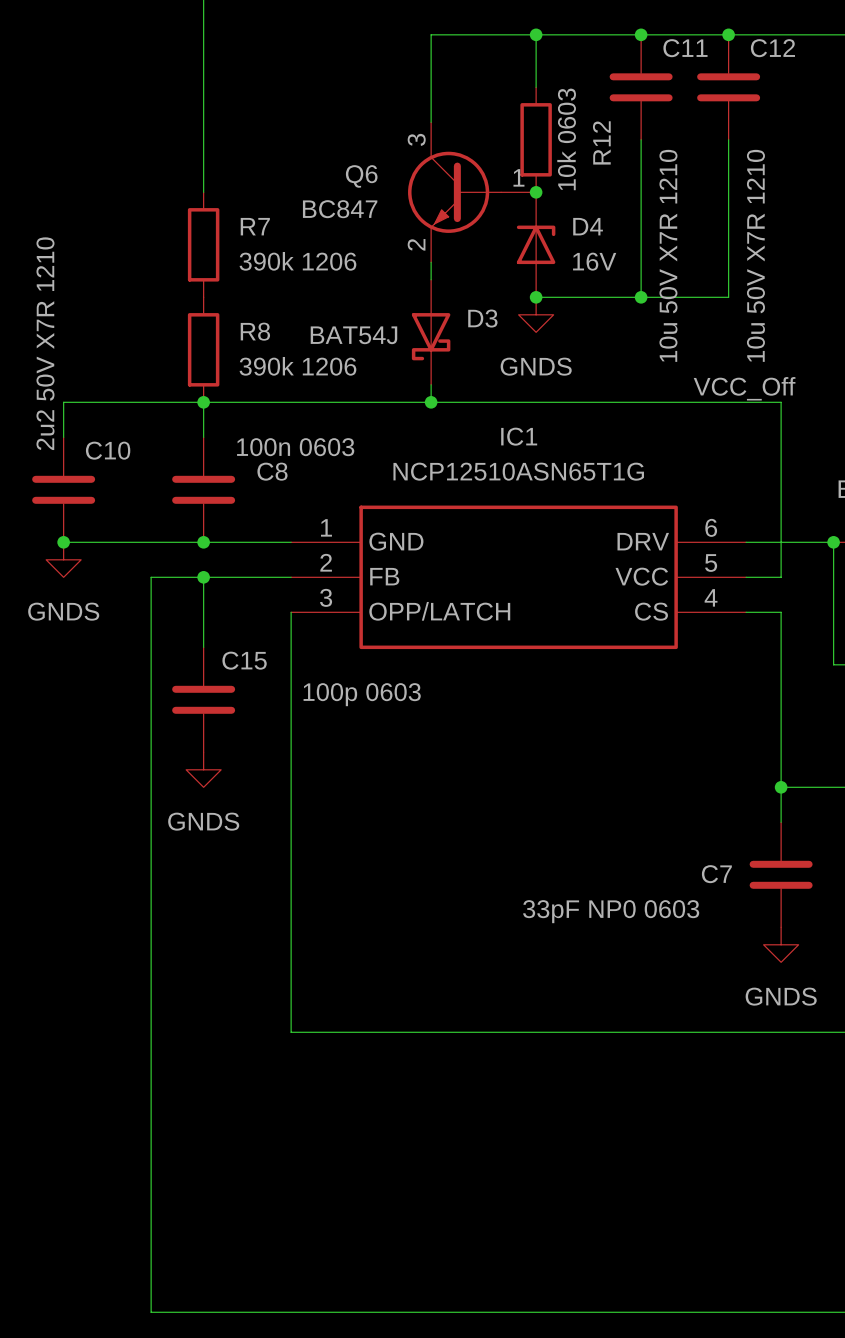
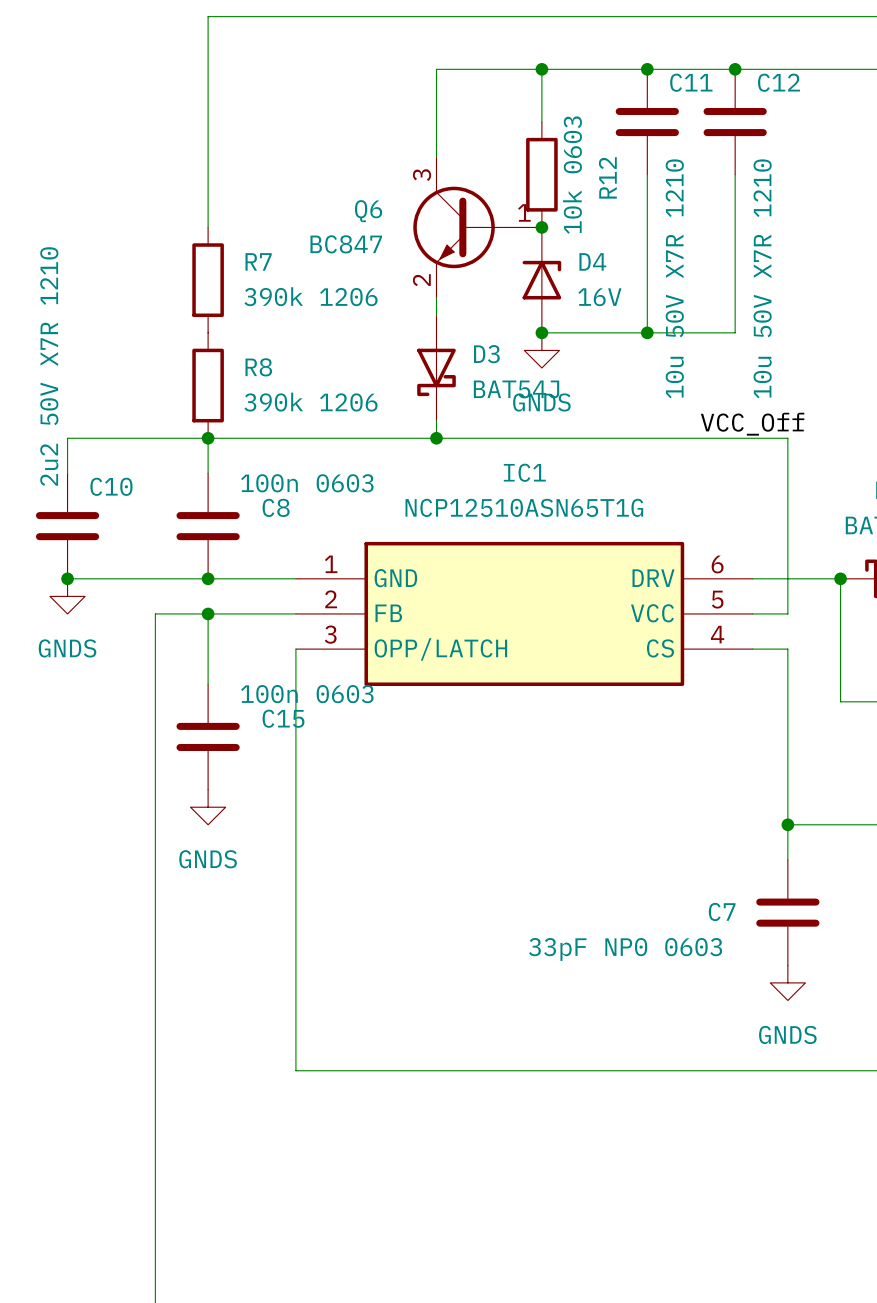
D3 value position: BAT54J (353, 335) -> BAT54J (516, 389)
C15 name position: C15 (244, 660) -> C15 (283, 718)
C15 value: 100p 0603 (362, 694) -> 100n 0603 (307, 694)

